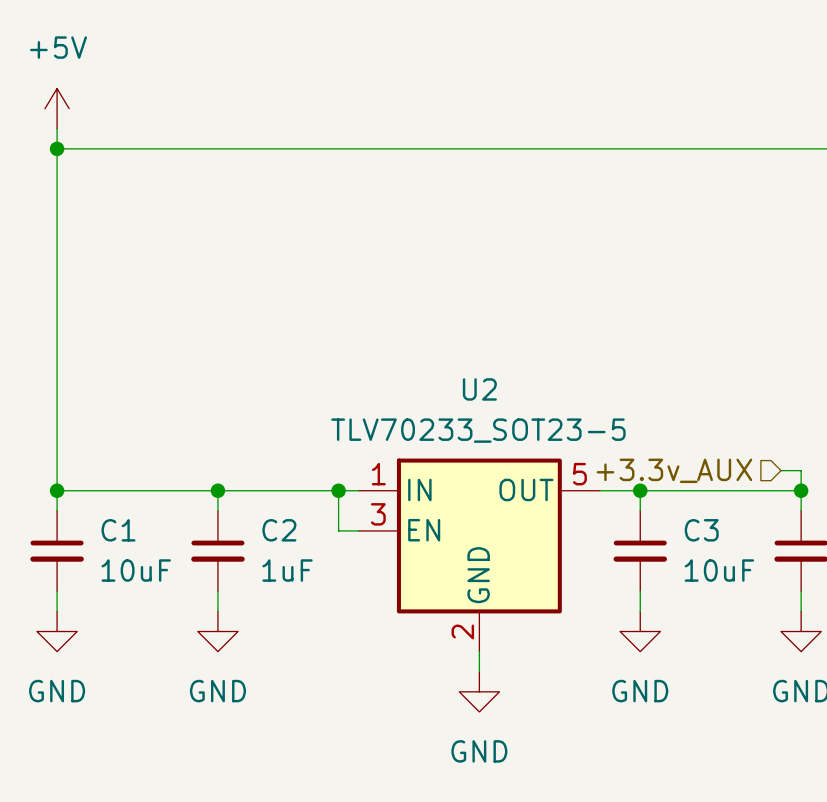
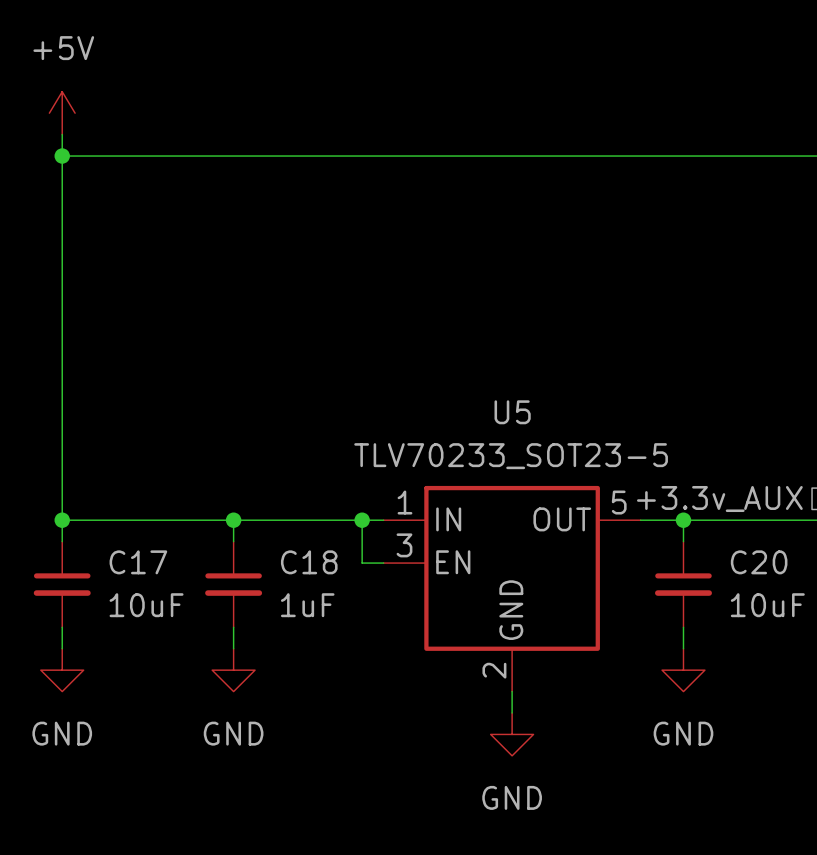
U2 name: U2 (479, 389) -> U5 (512, 412)
C1 name: C1 (118, 530) -> C17 (138, 562)
C2 name: C2 (279, 530) -> C18 (309, 562)
C3 name: C3 (701, 530) -> C20 (759, 562)

